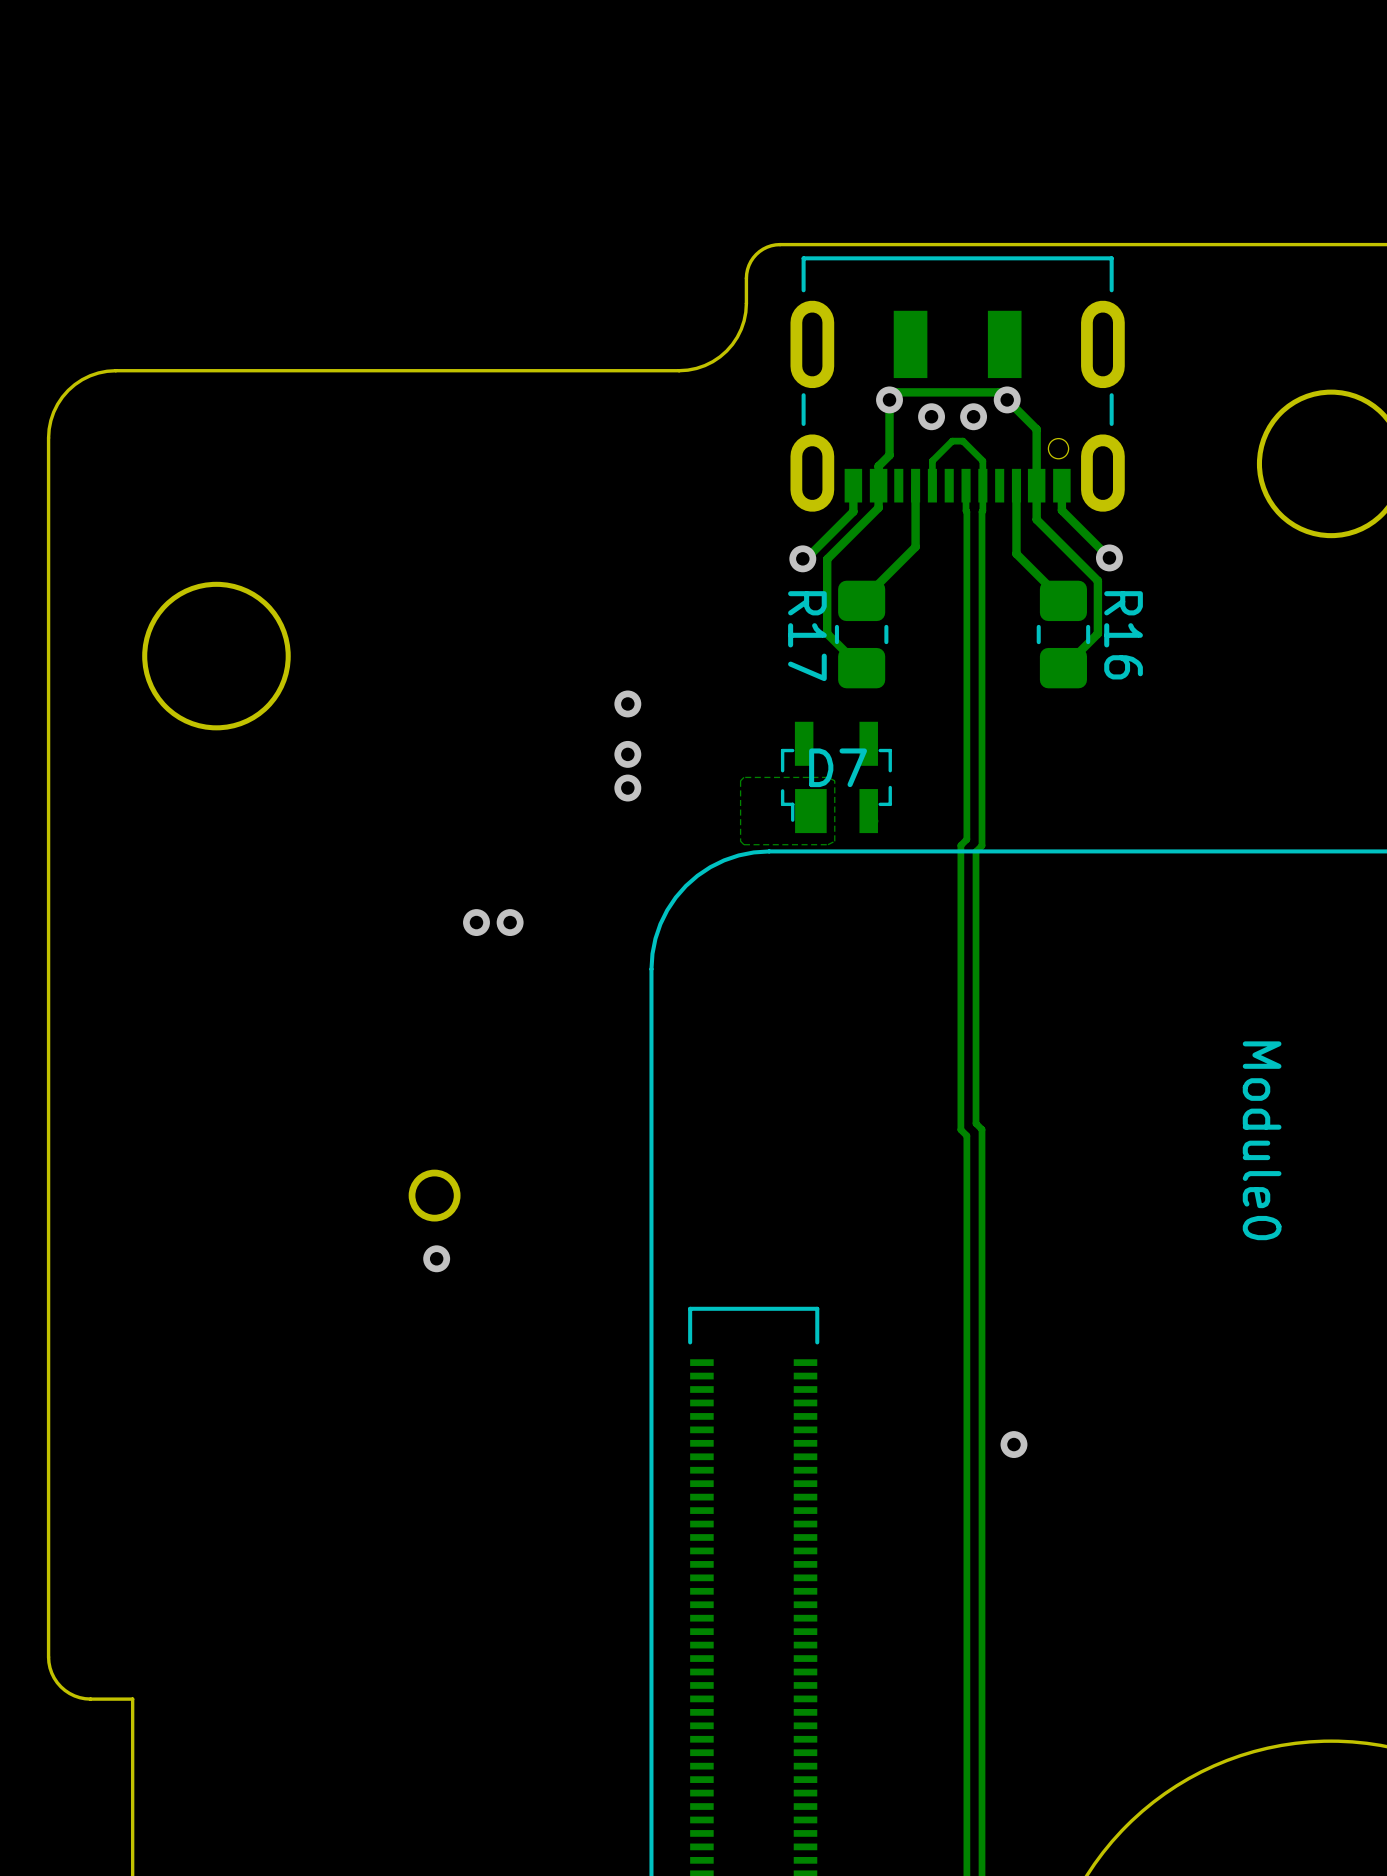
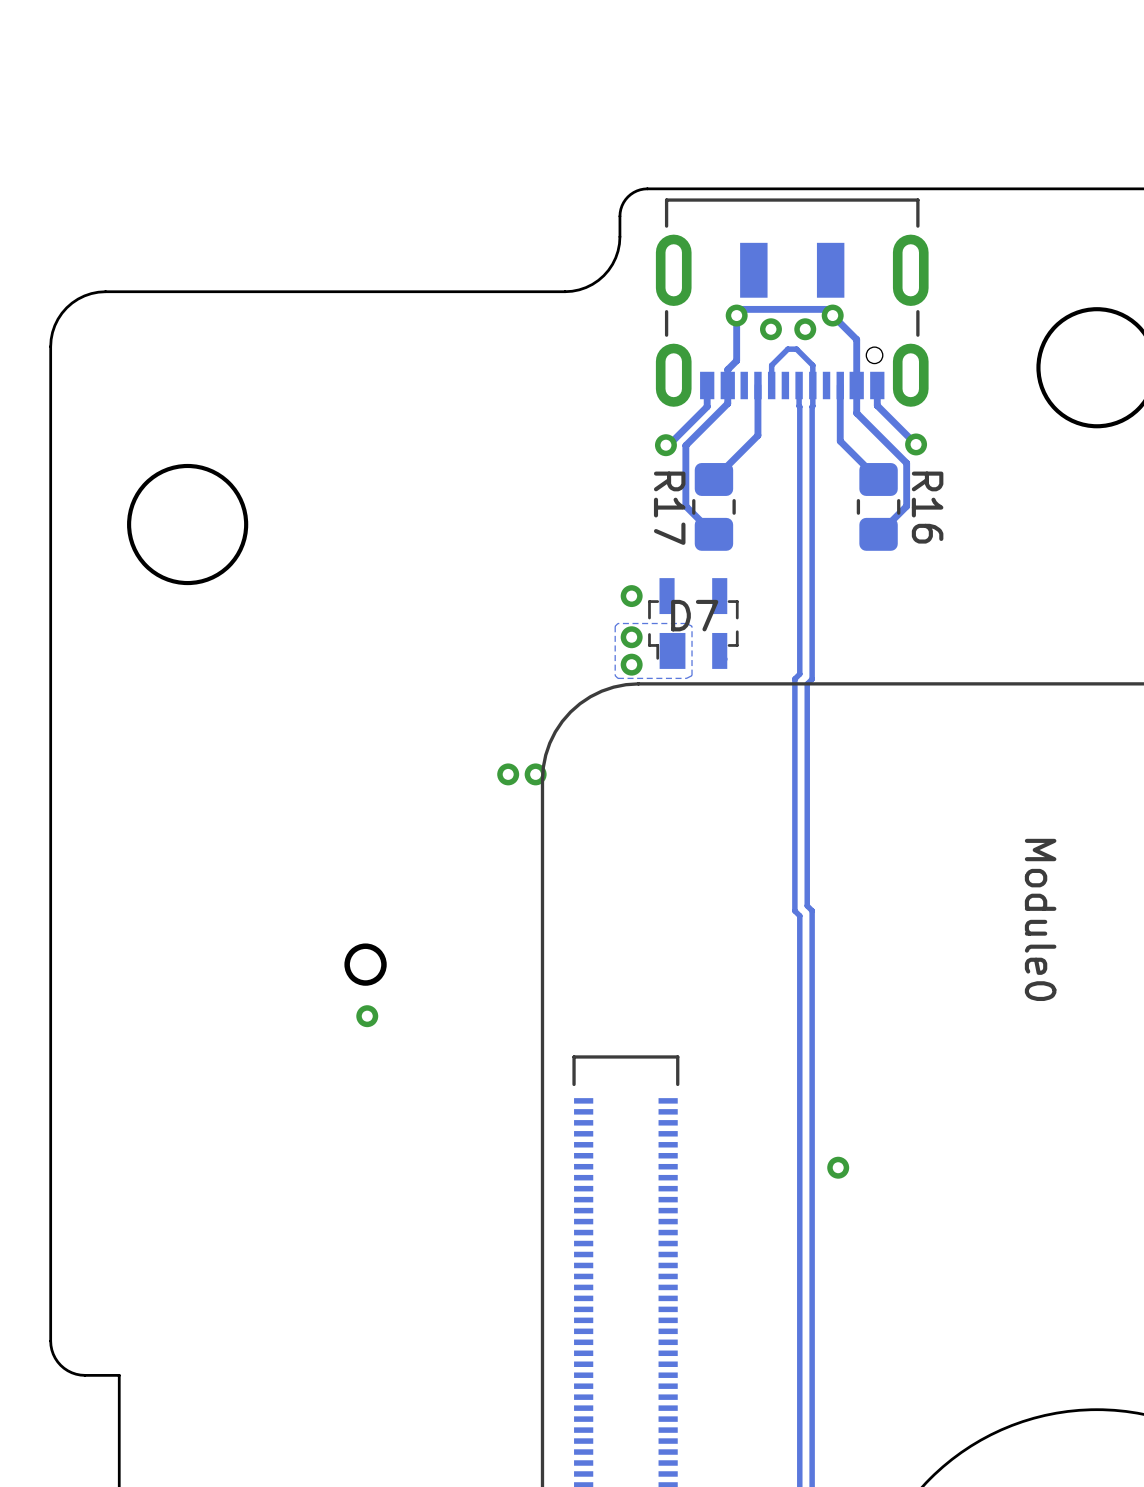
via: (627, 703) -> none
via: none -> (631, 596)
via: (627, 754) -> none
via: (627, 788) -> none
via: none -> (631, 637)
via: none -> (631, 664)
via: (476, 922) -> none
via: (510, 922) -> none
via: none -> (508, 774)
via: none -> (535, 774)

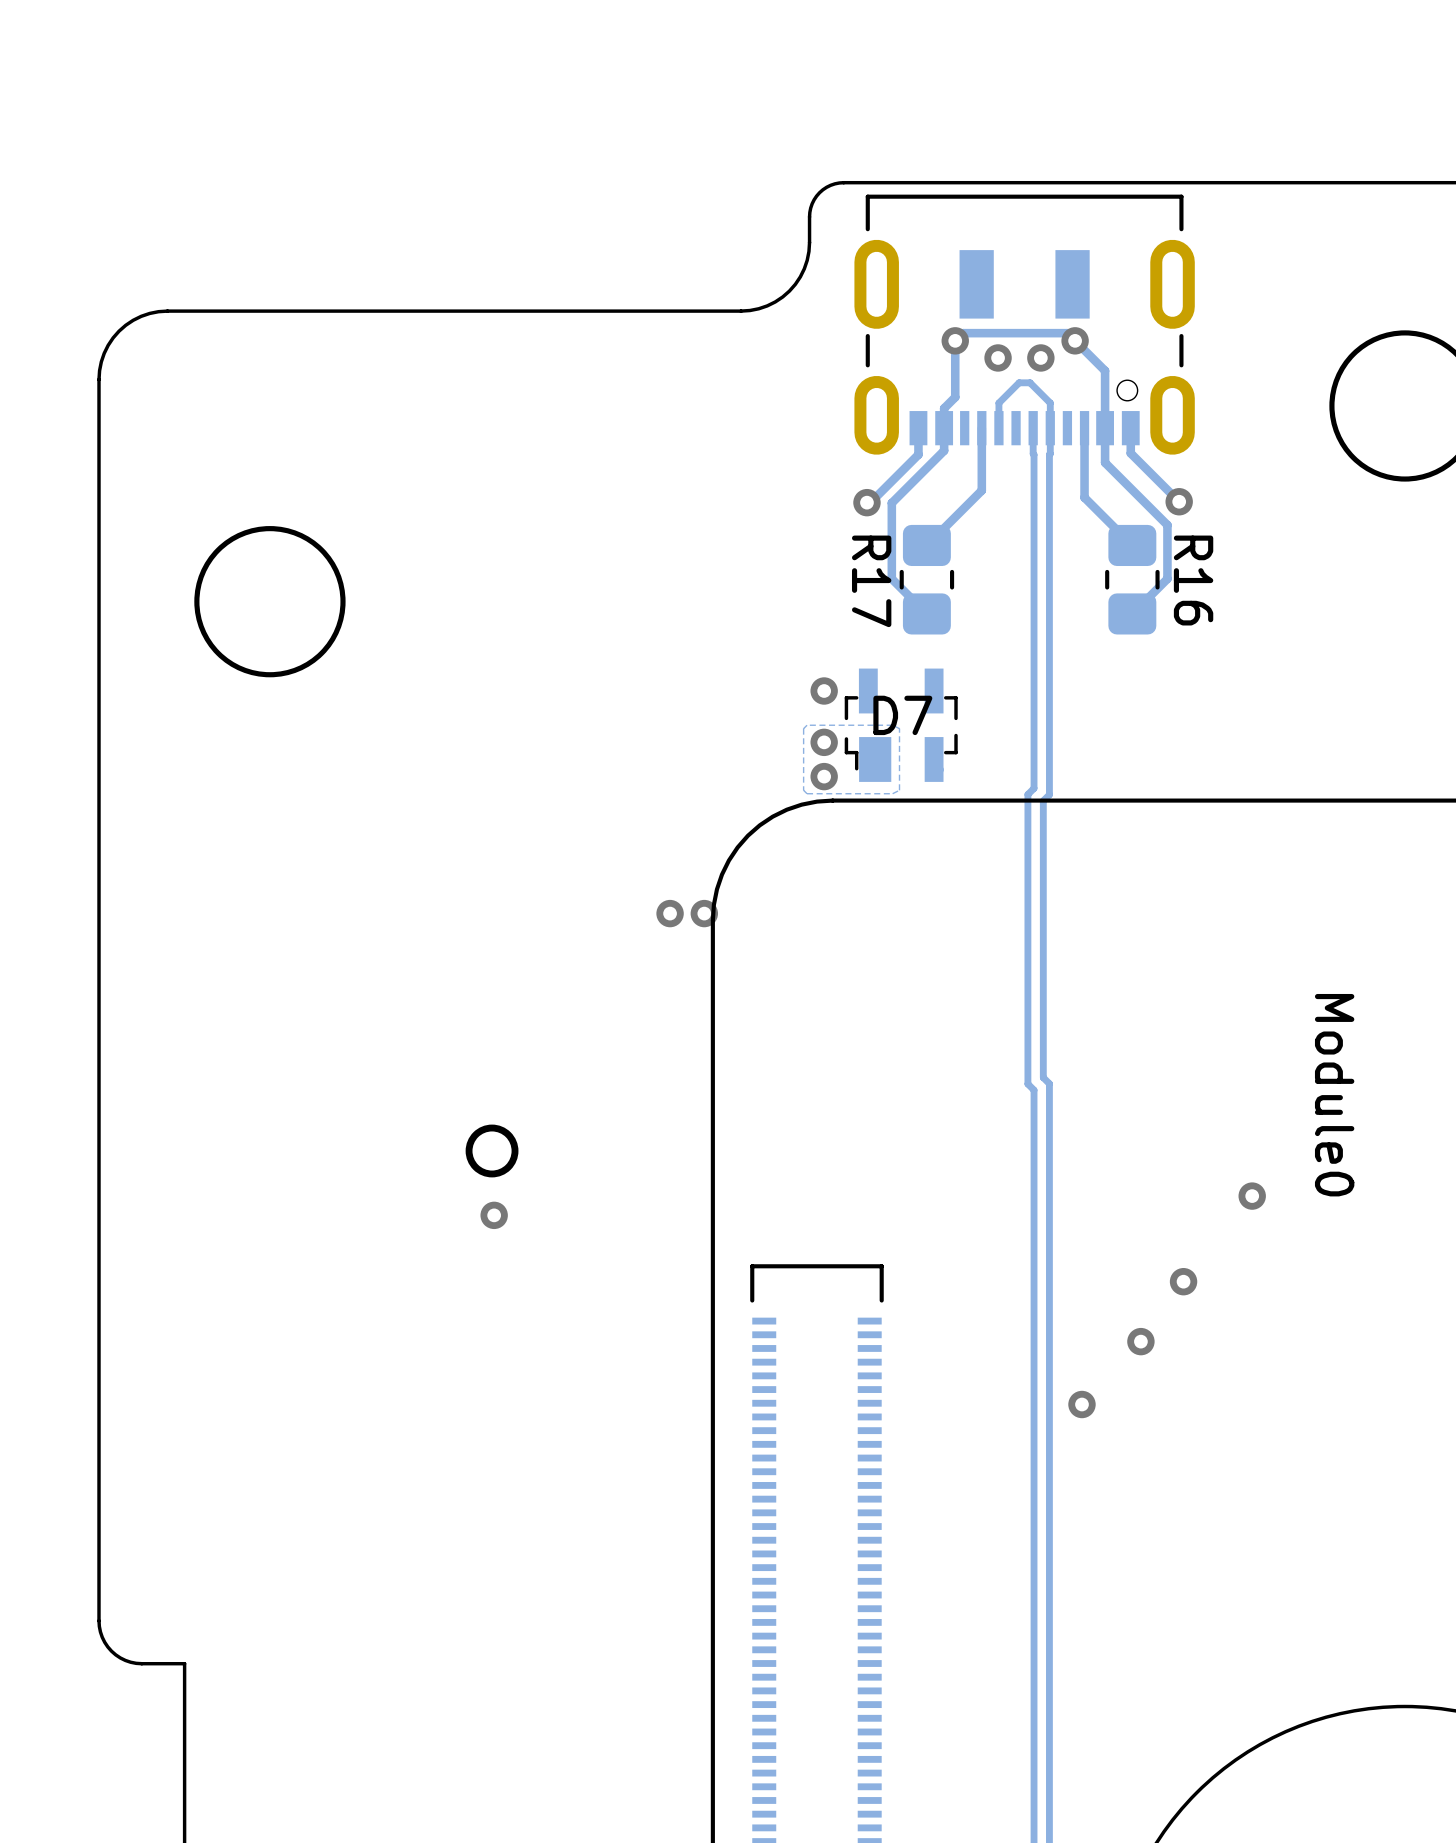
via: none -> (1252, 1196)
via: none -> (1183, 1281)
via: none -> (1140, 1341)

